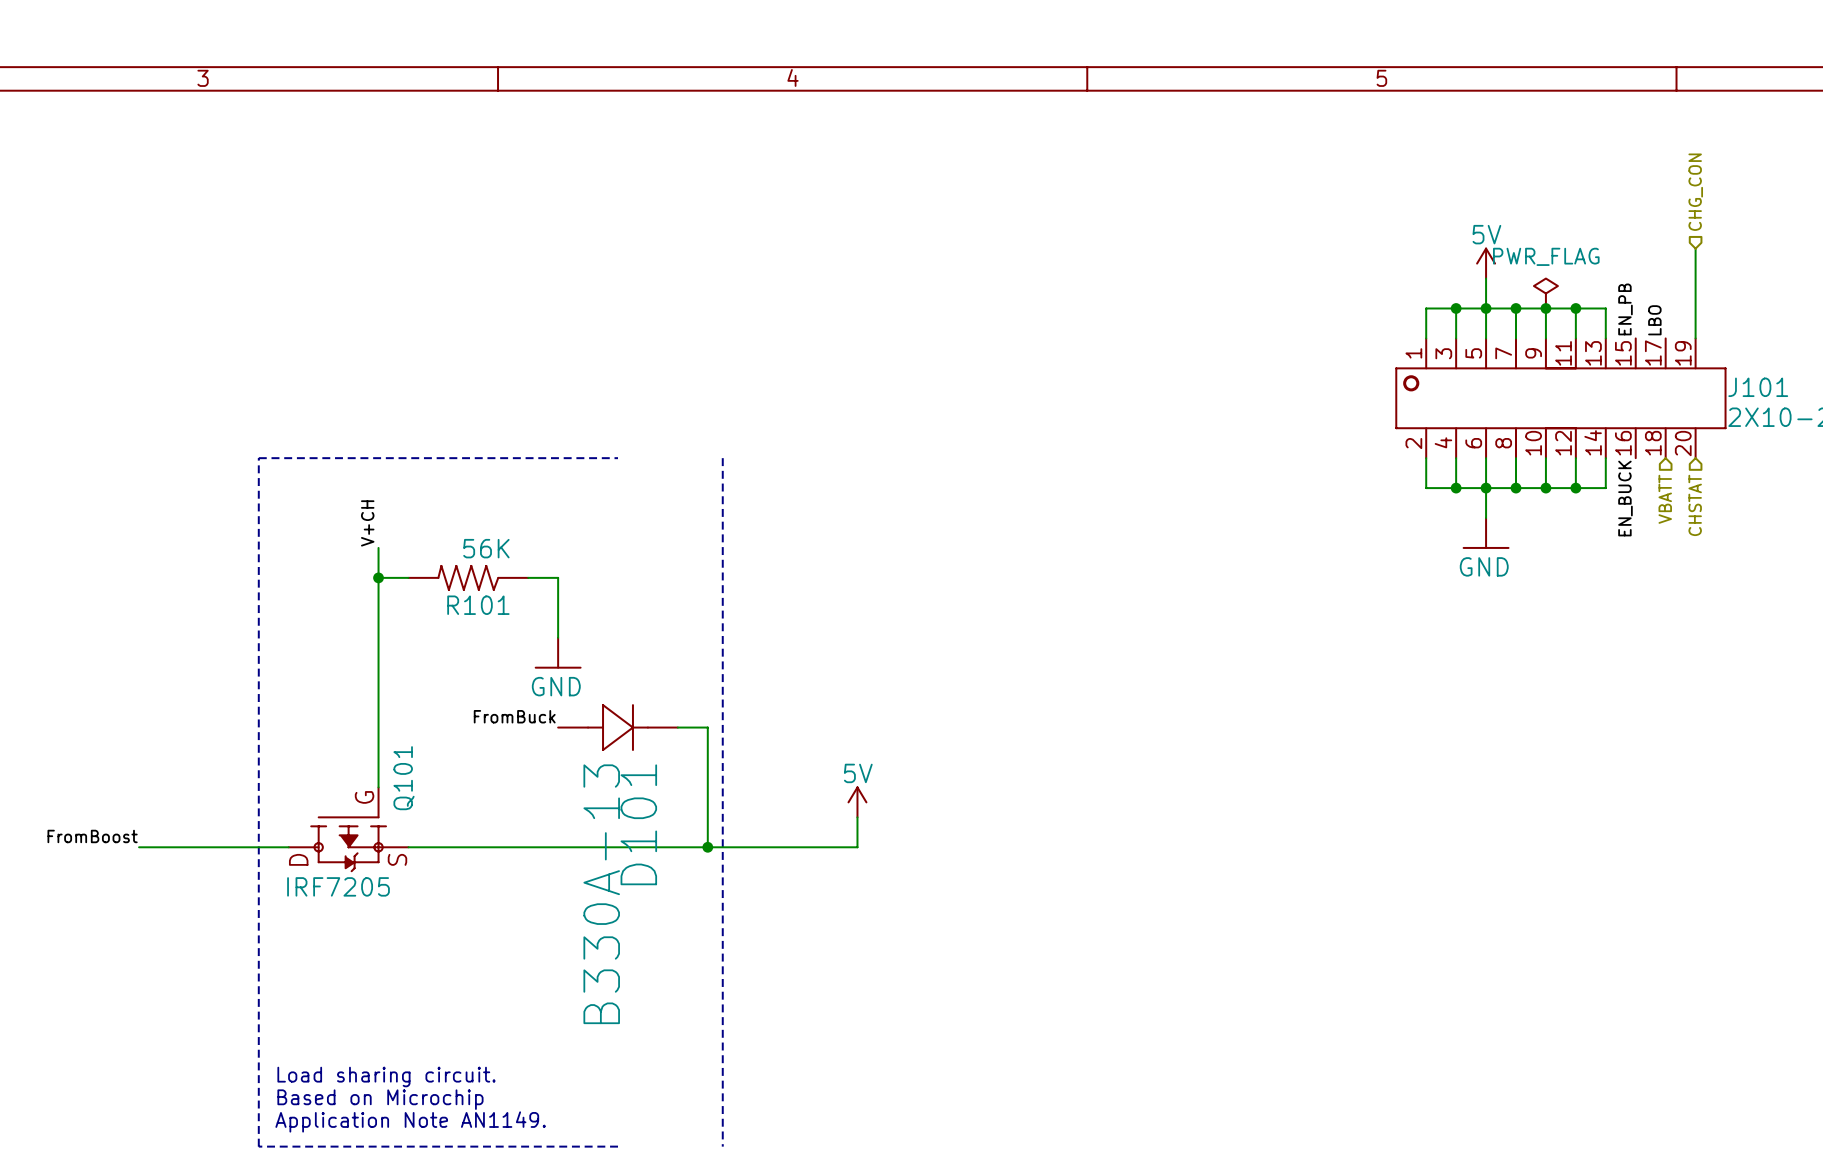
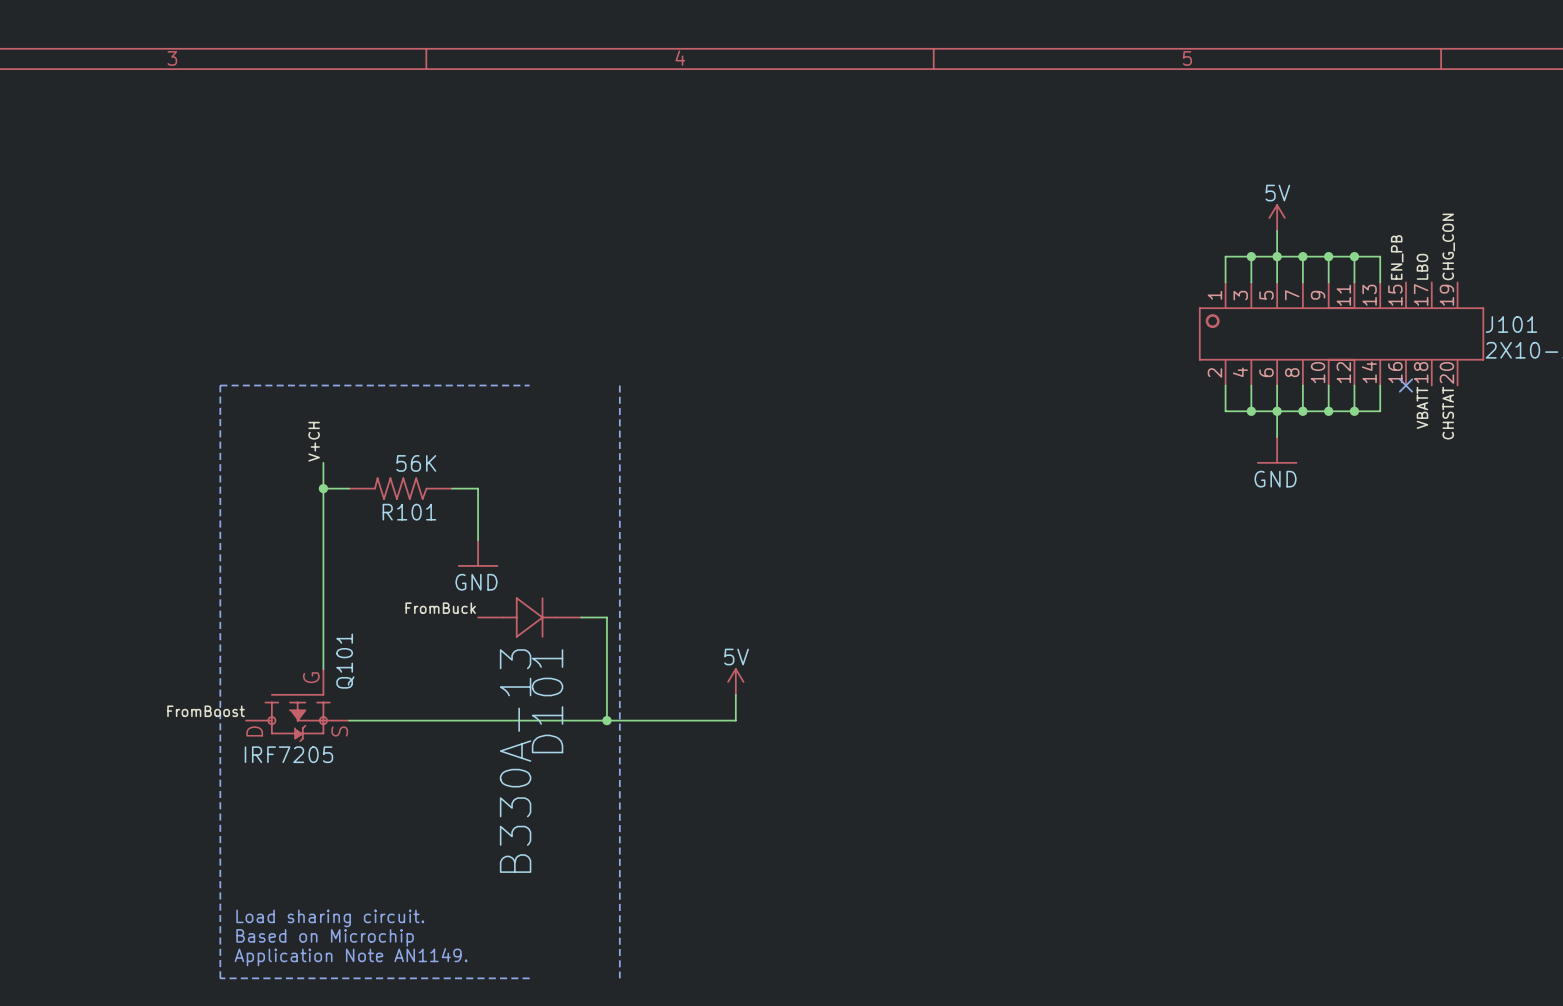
hierarchical label: CHG_CON (1695, 192) -> none
wire: (1695, 248) (1695, 338) -> none
power symbol: PWR_FLAG (1545, 293) -> none
label: none -> CHG_CON (1448, 246)
no-connect mark: none -> (1406, 385)
label: none -> VBATT (1422, 407)
label: none -> CHSTAT (1448, 413)
label: EN_BUCK (1625, 498) -> none
hierarchical label: VBATT (1665, 499) -> none
hierarchical label: CHSTAT (1695, 505) -> none
label position: FromBoost (92, 836) -> FromBoost (206, 711)
wire: (139, 847) (288, 847) -> none

